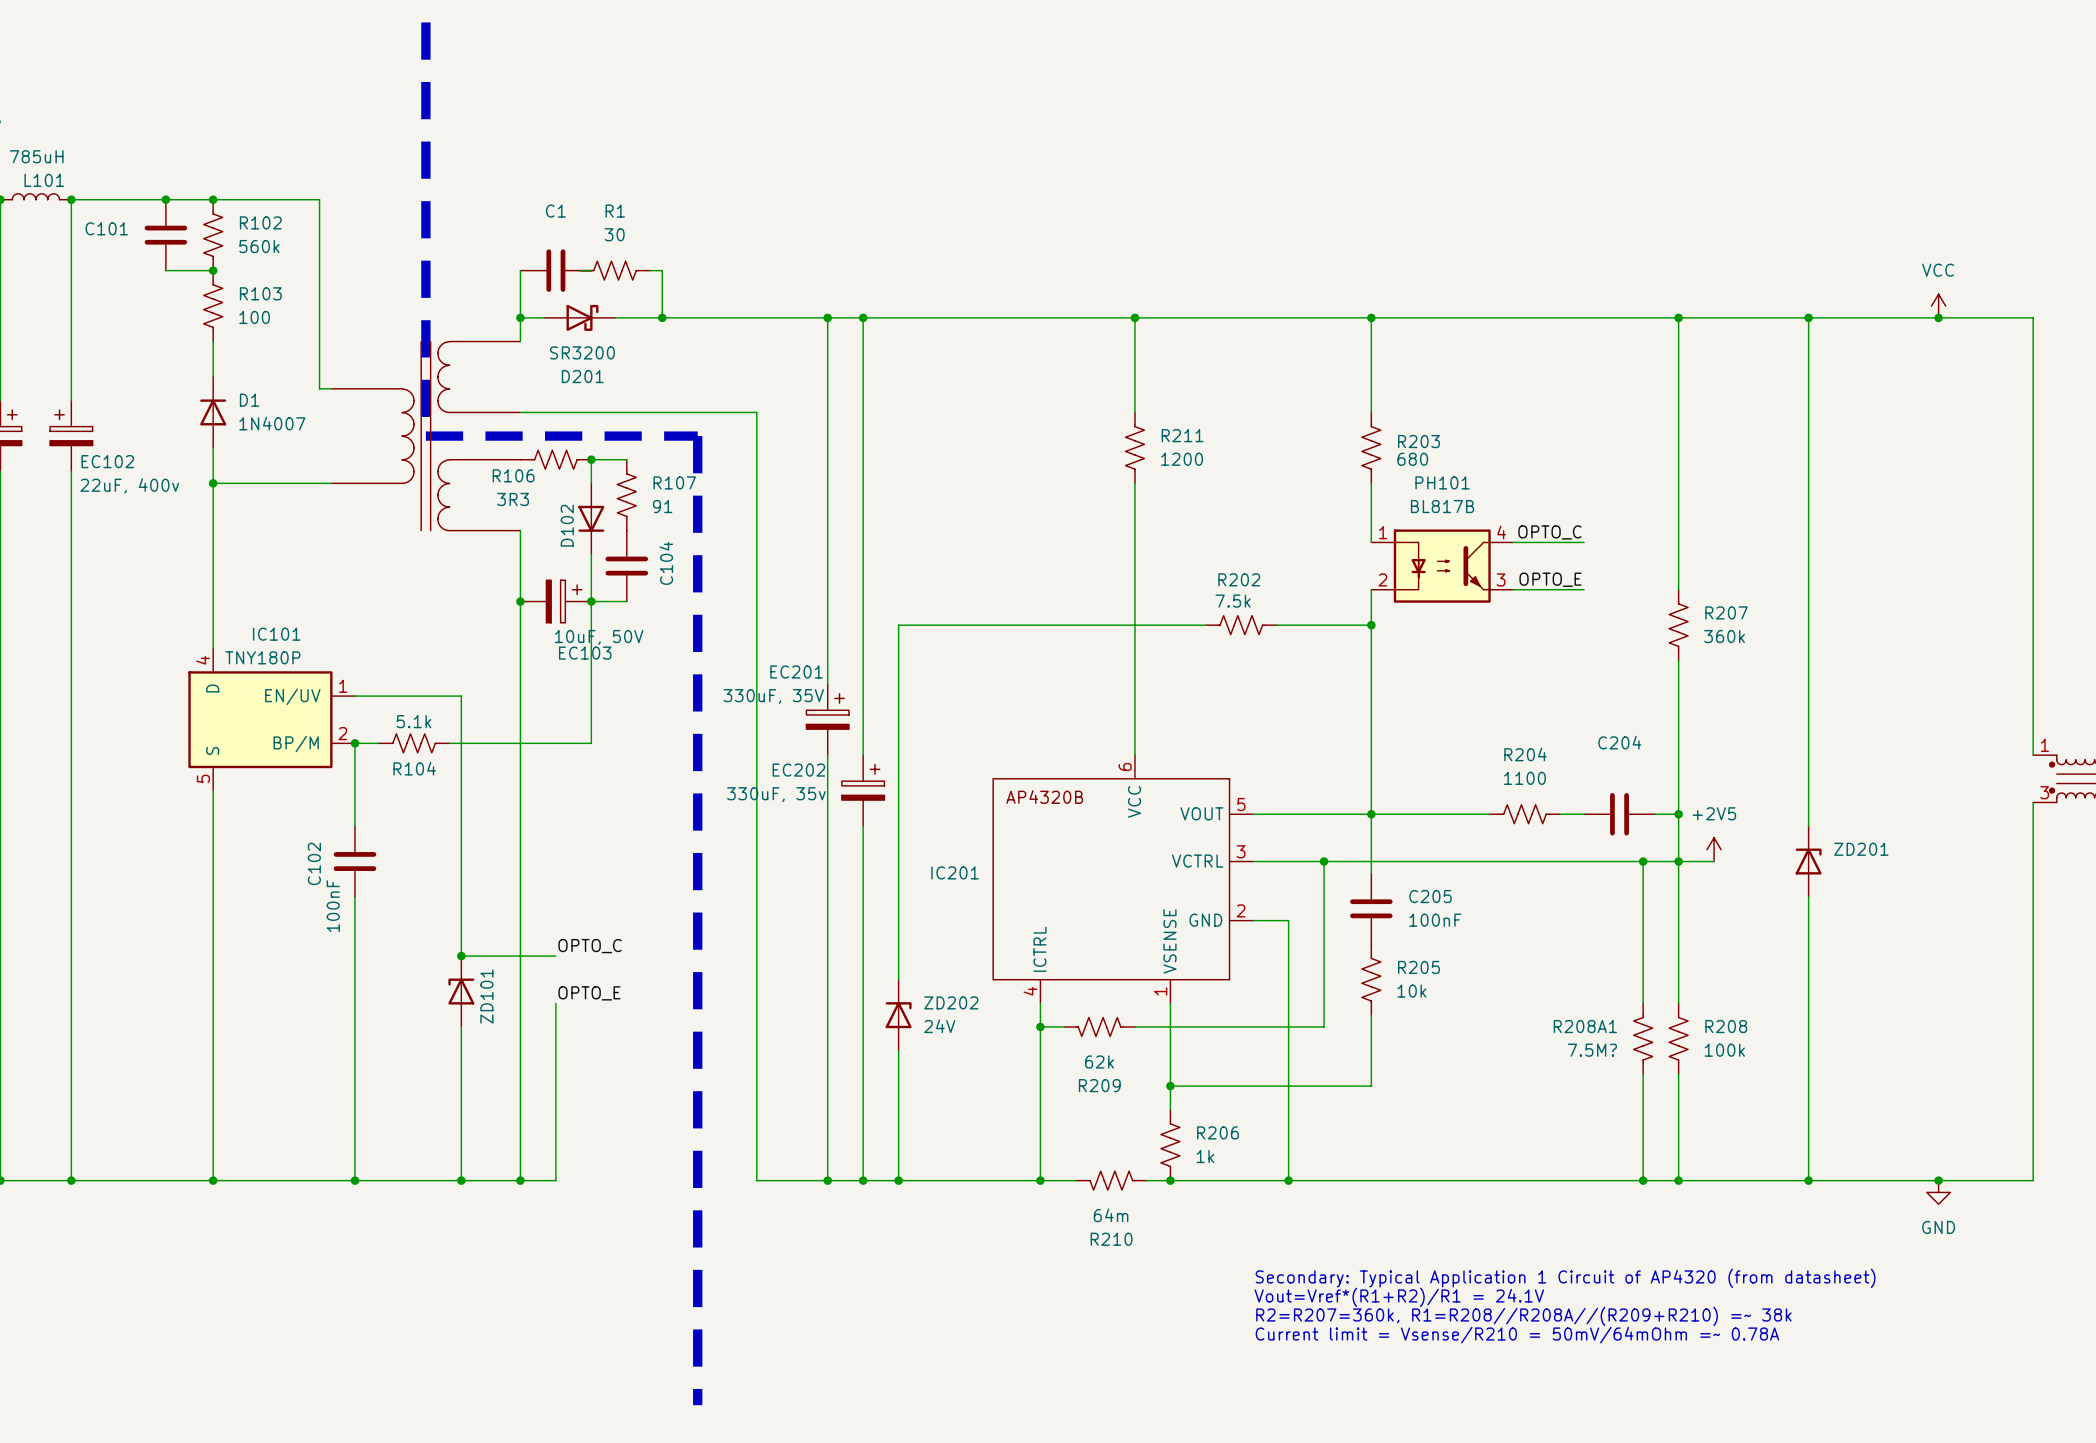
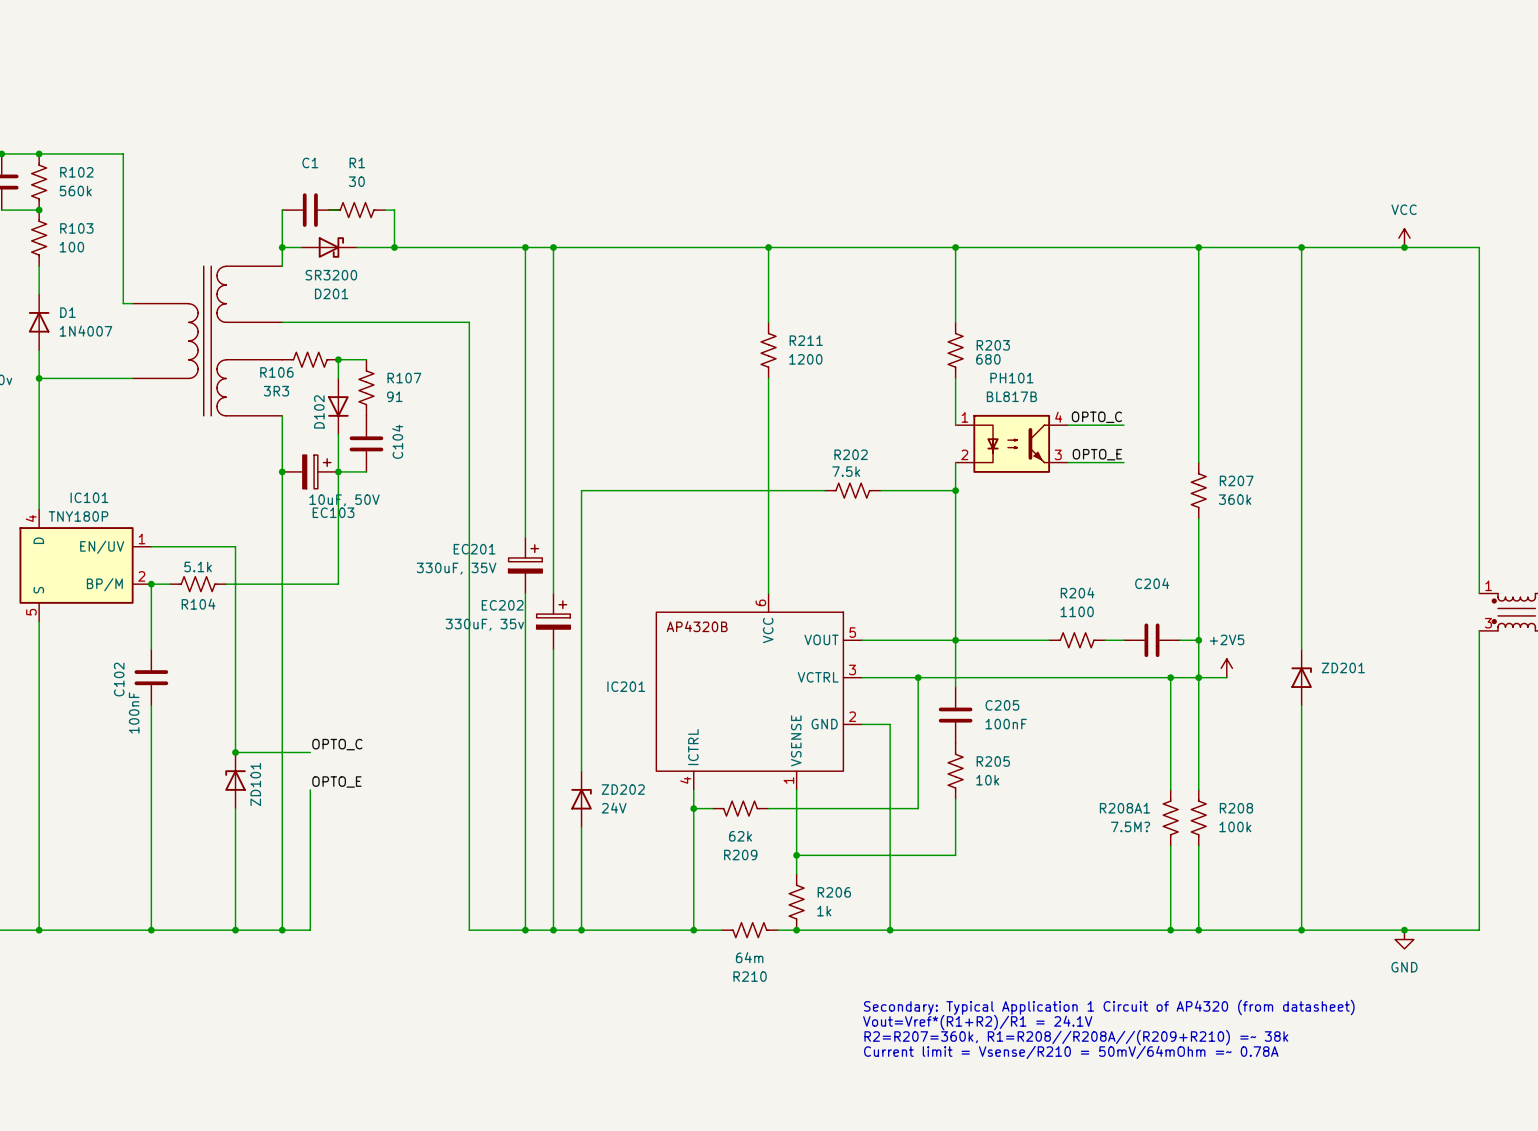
line: (425, 22) (425, 436) (697, 436) (697, 1405) -> none
EC201 name position: EC201 (796, 672) -> EC201 (474, 549)
EC201 value position: 330uF, 35V (773, 696) -> 330uF, 35V (456, 568)

